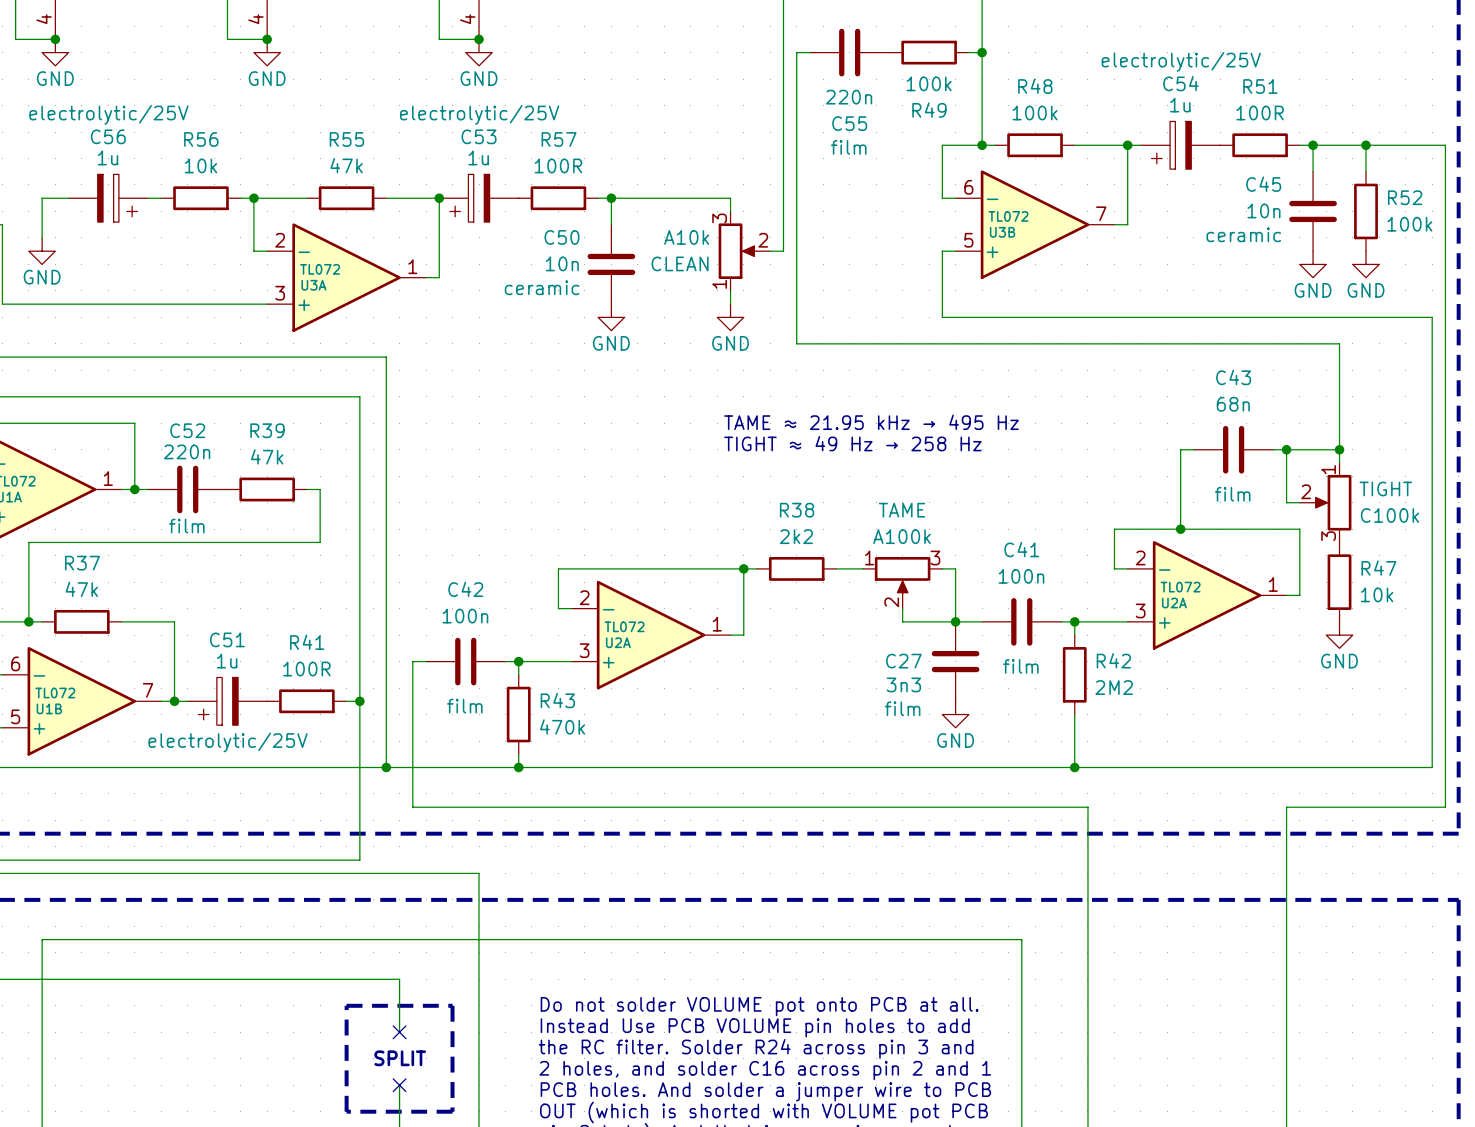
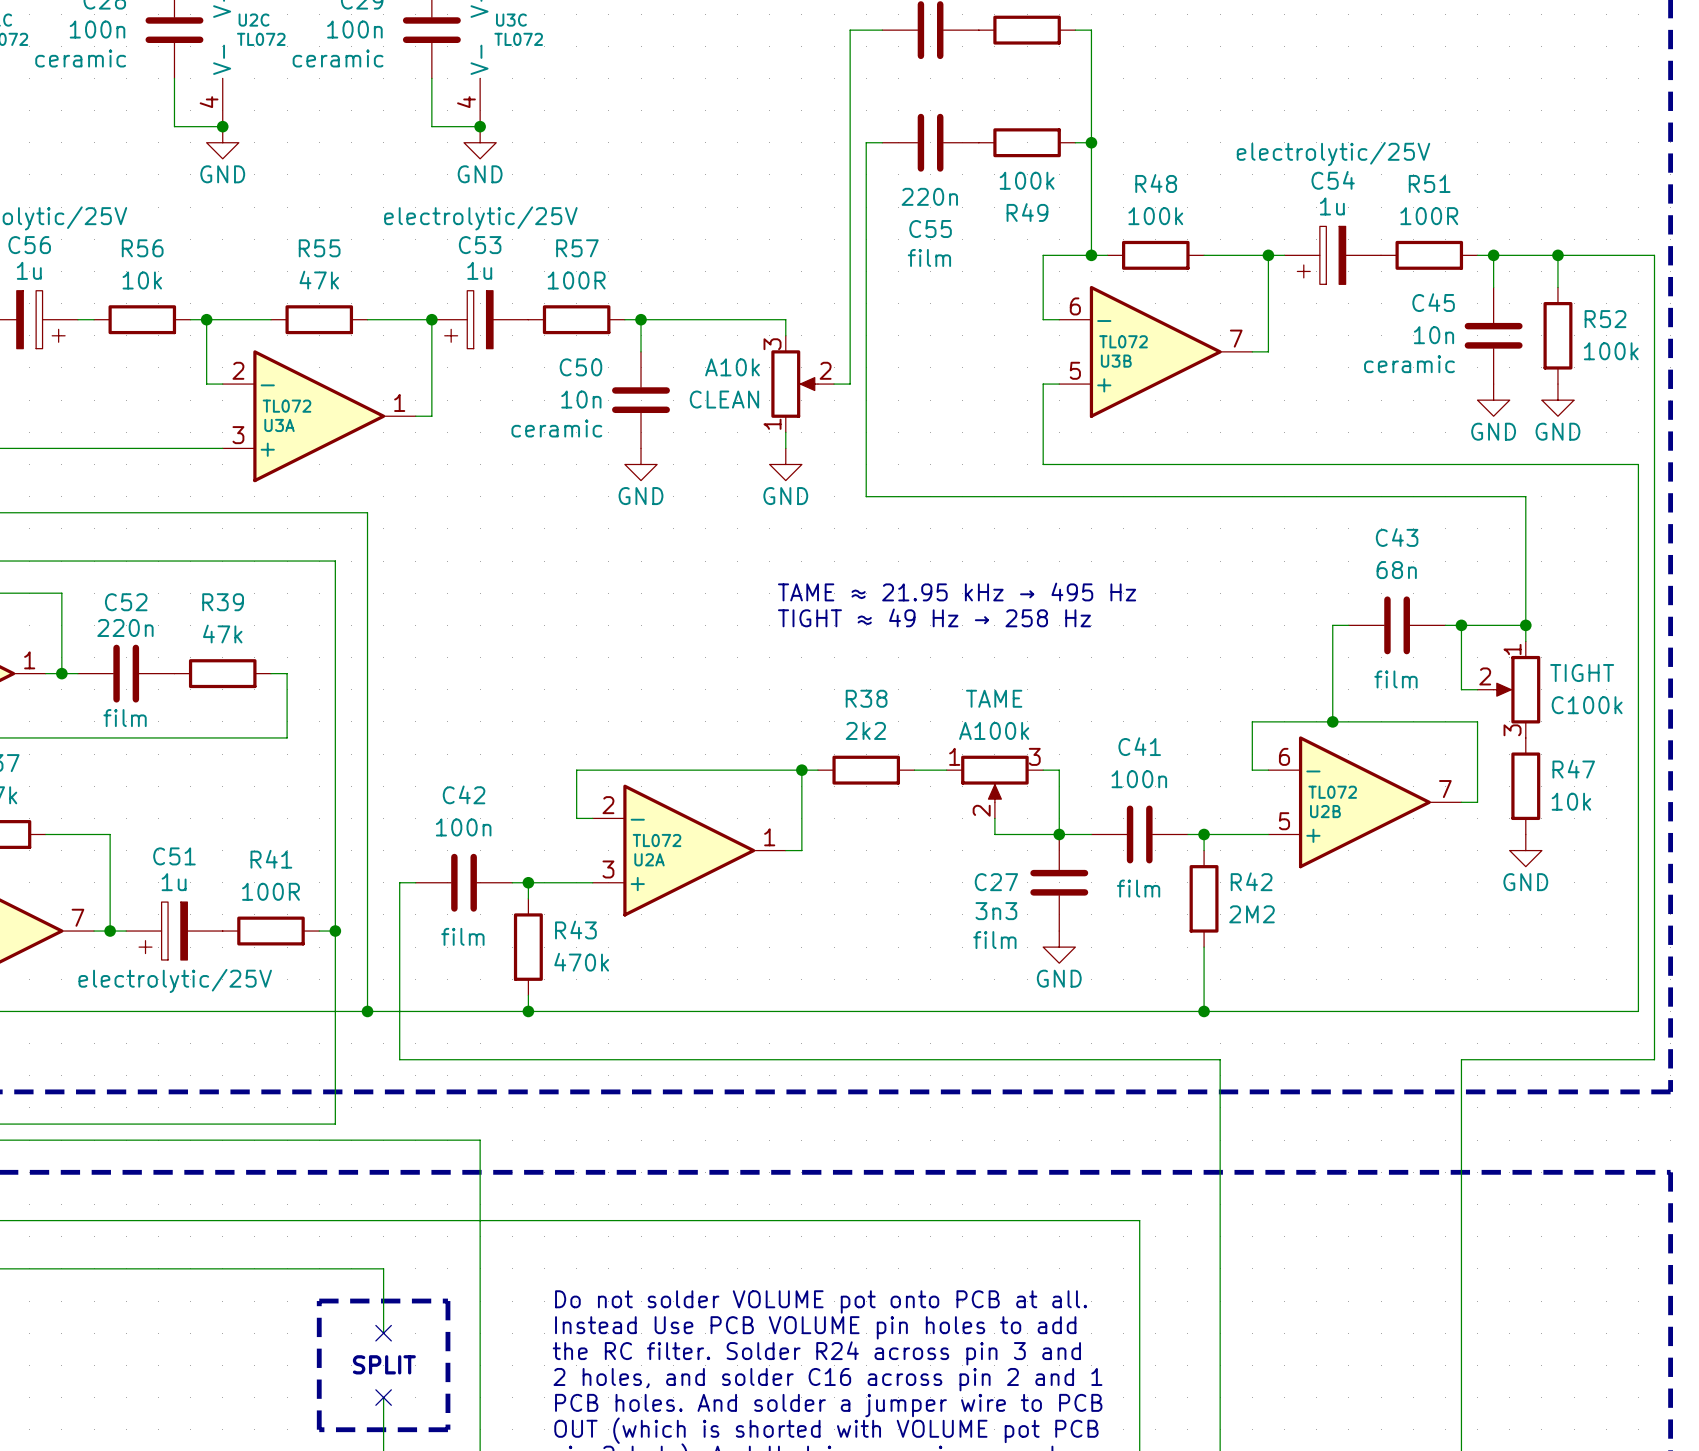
U2A pin number: 2 (1140, 558) -> 6 (1284, 756)
U2A pin number: 1 (1273, 584) -> 7 (1445, 789)
U2A name: U2A (1174, 602) -> U2B (1325, 811)
U2A pin number: 3 (1140, 610) -> 5 (1284, 821)

